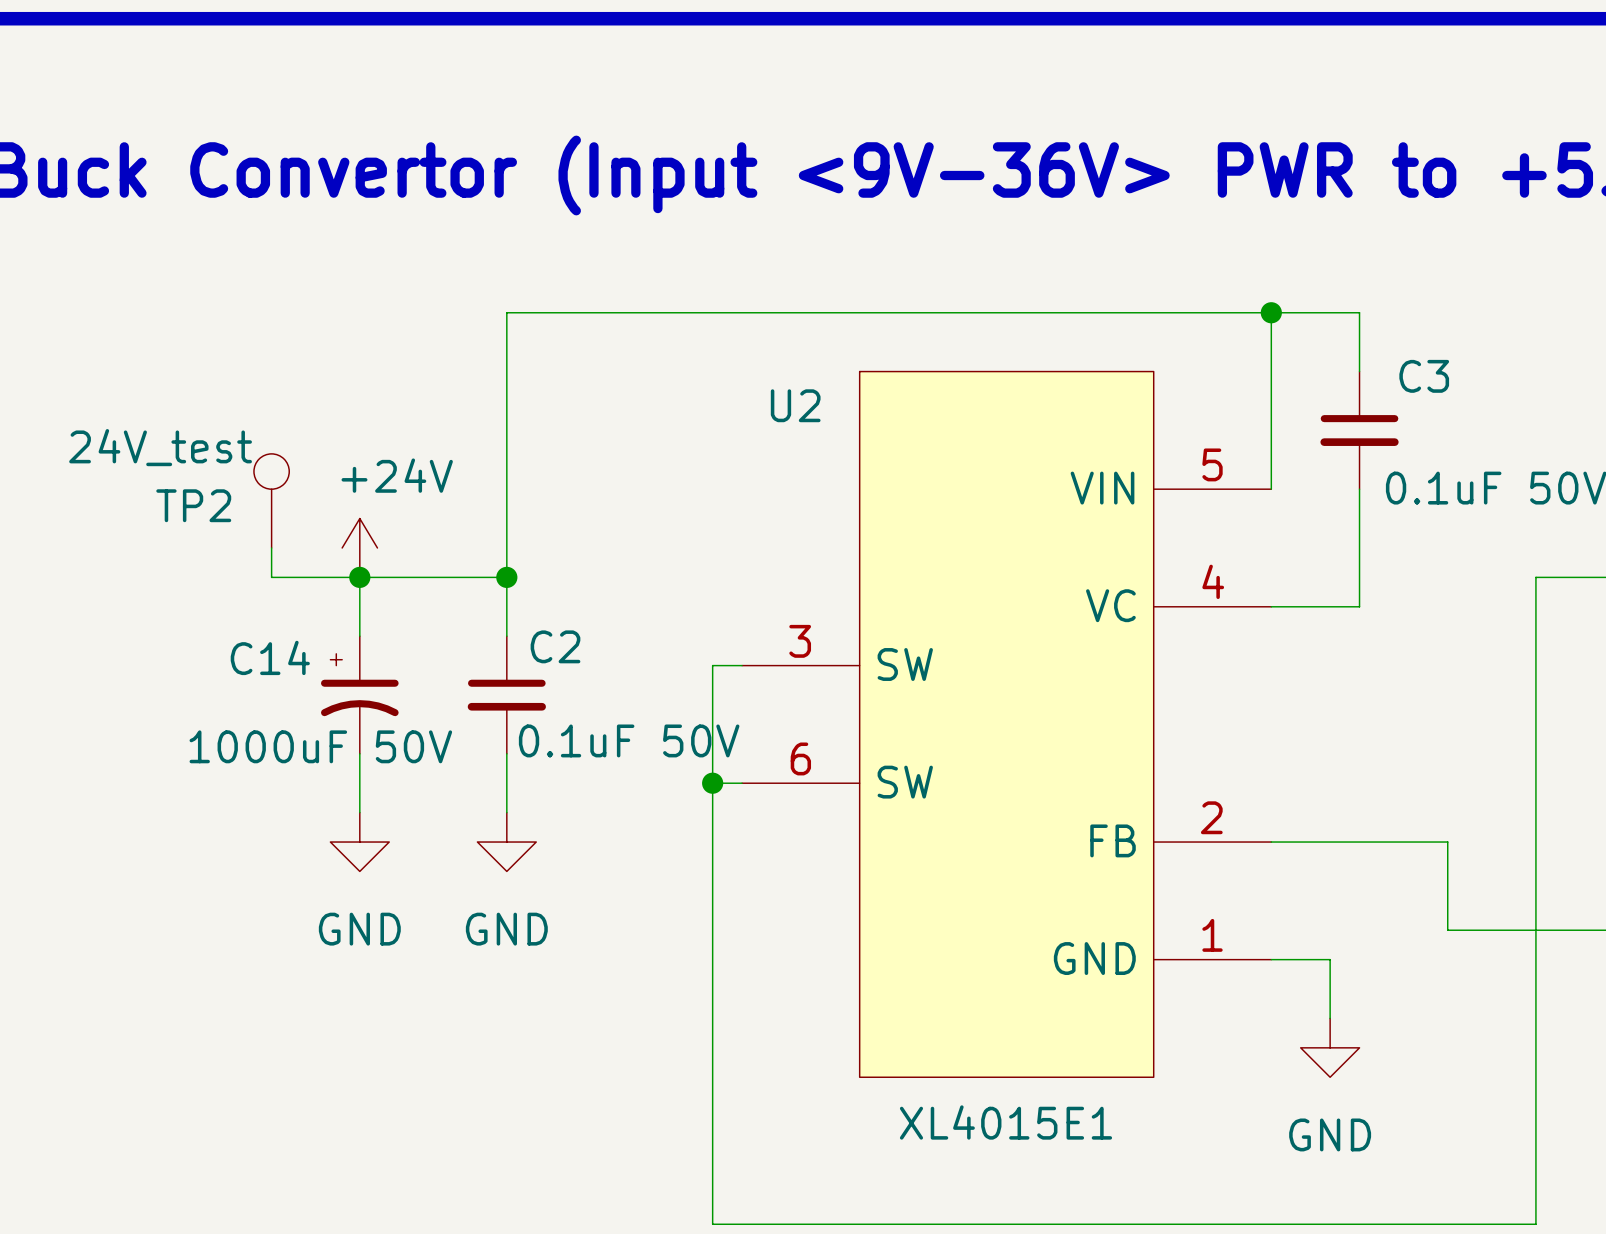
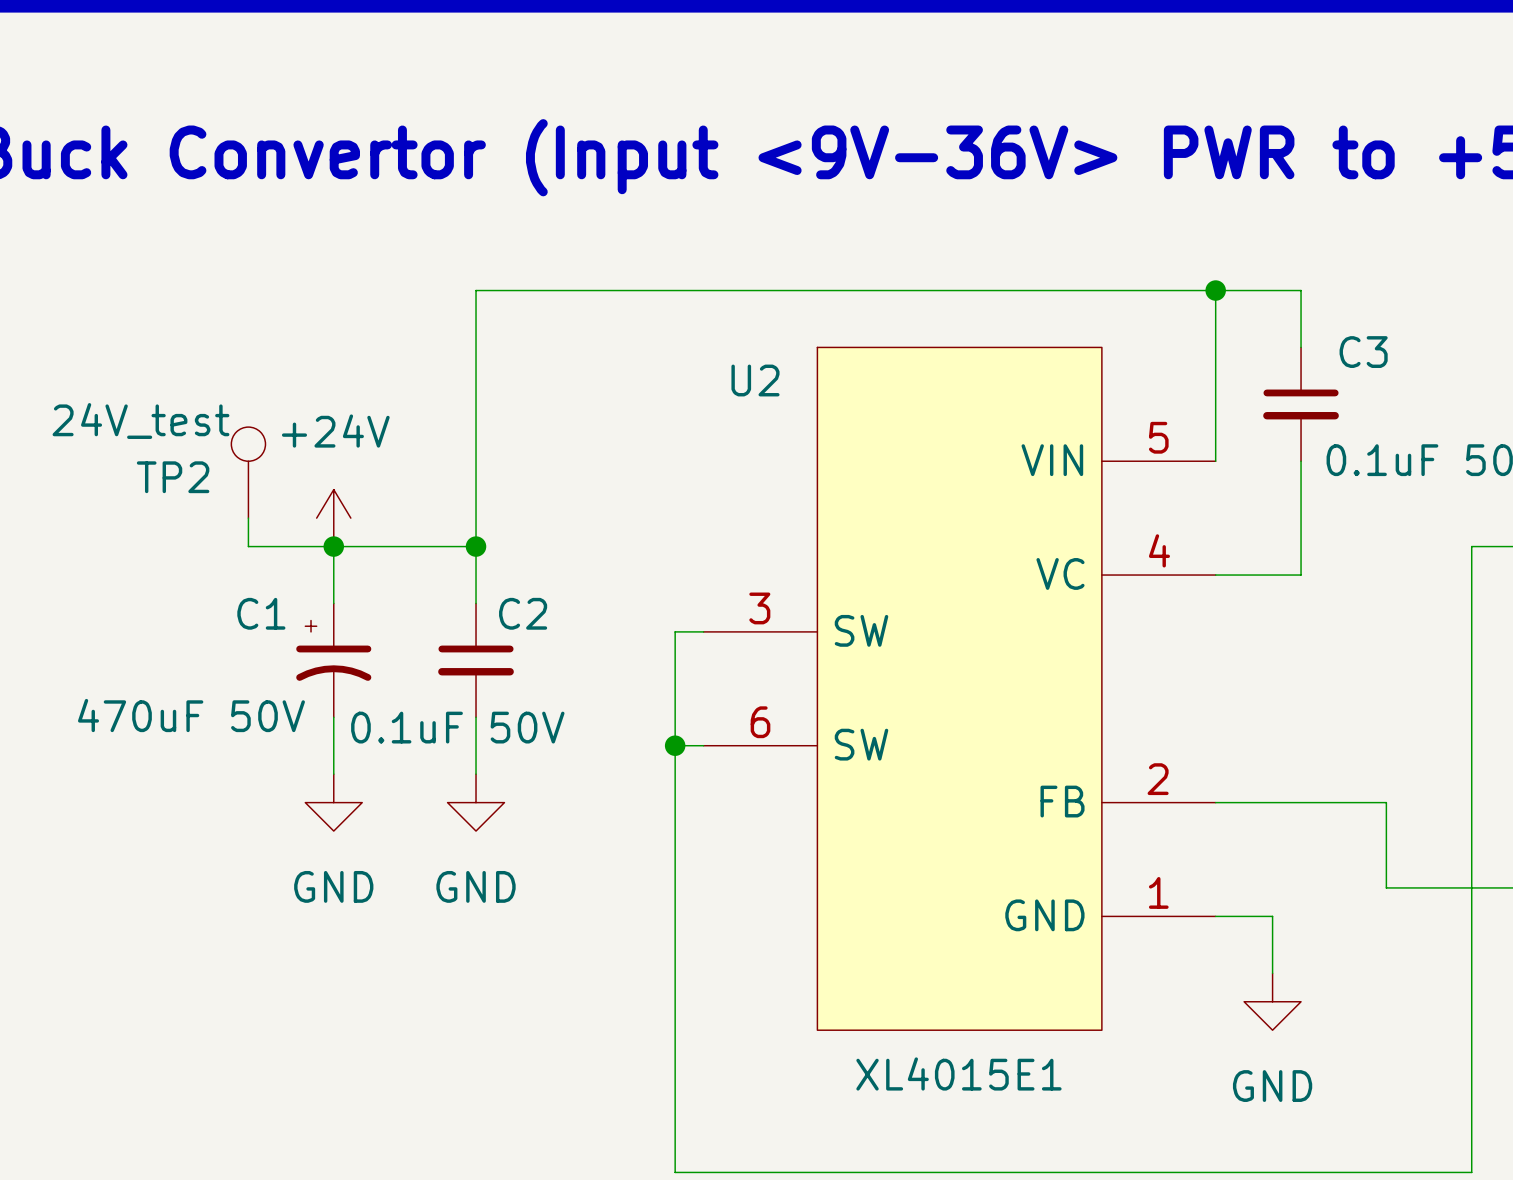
power symbol text position: +24V (397, 475) -> +24V (335, 431)
C14 name: C14 (270, 657) -> C1 (261, 613)
C2 value position: 0.1uF 50V (629, 740) -> 0.1uF 50V (457, 727)
C14 value: 1000uF 50V (320, 746) -> 470uF 50V (191, 715)

